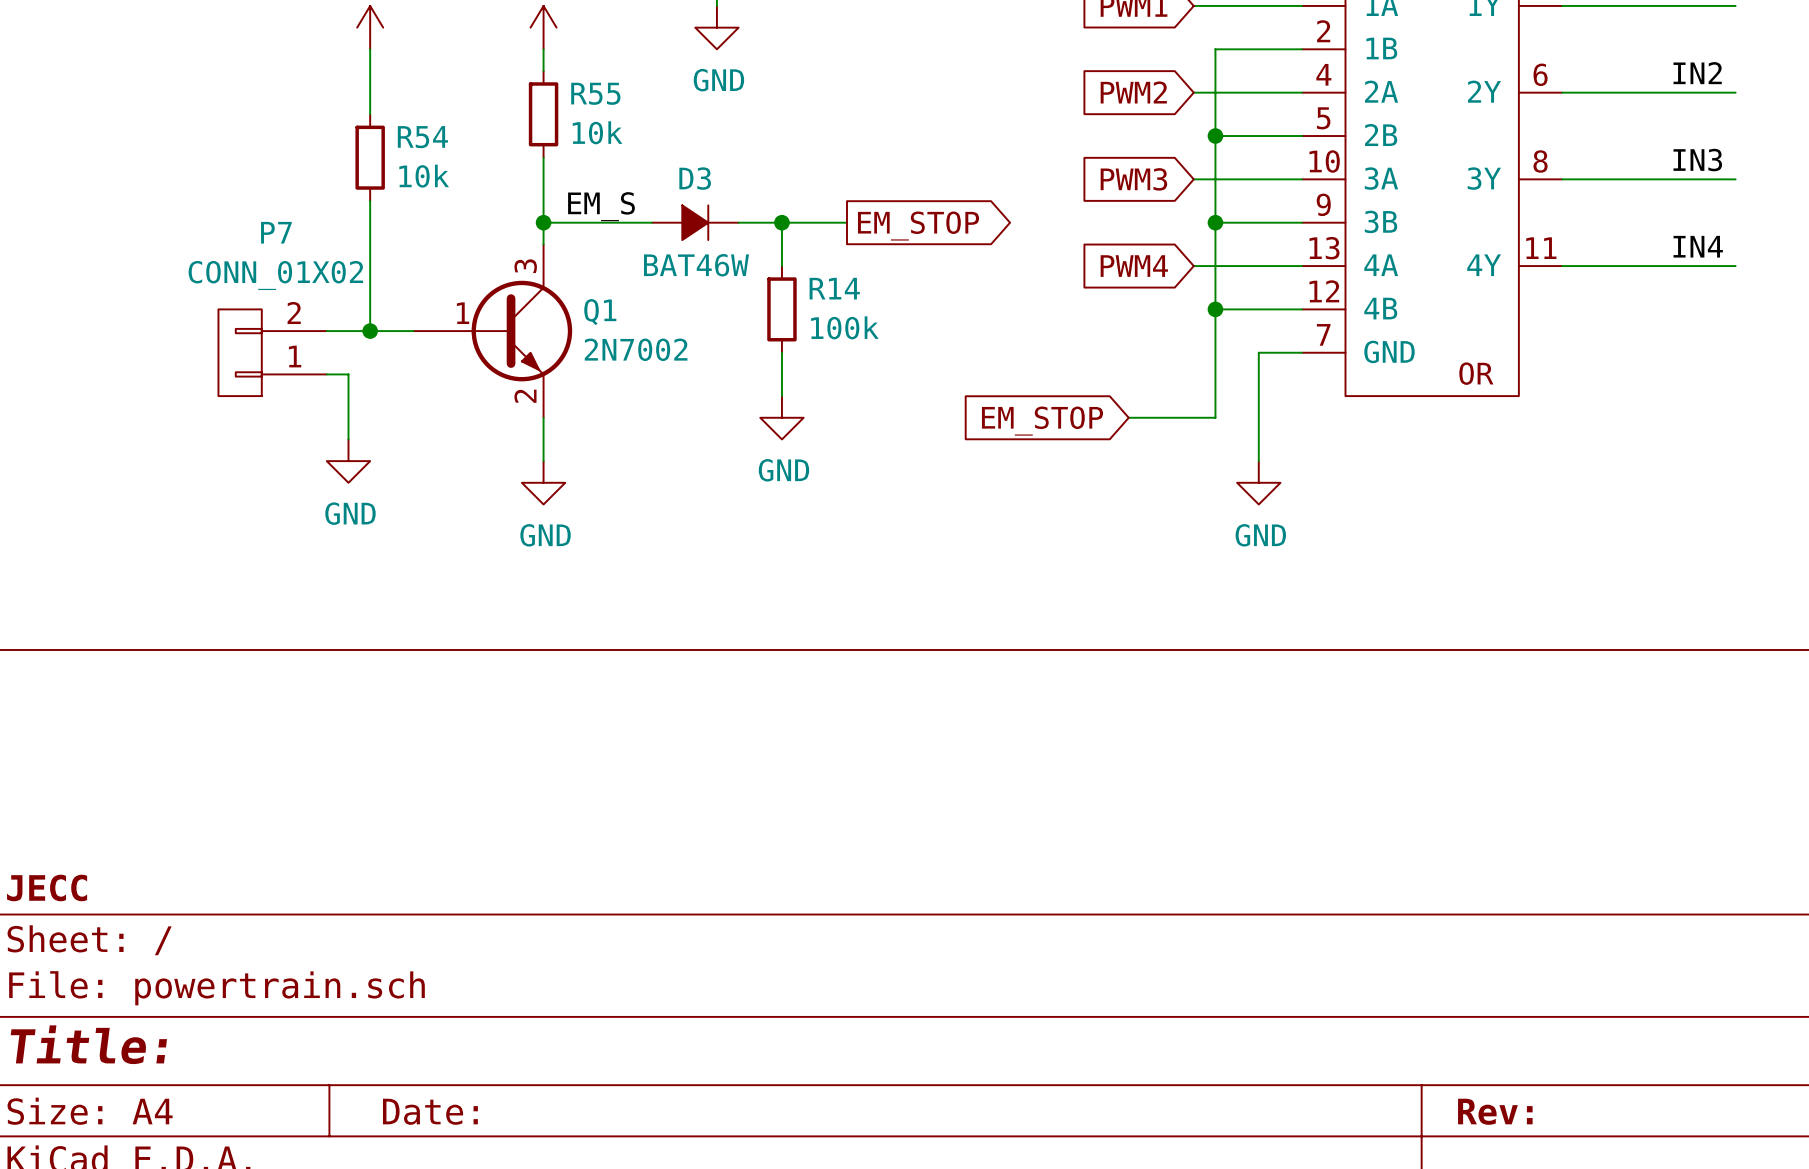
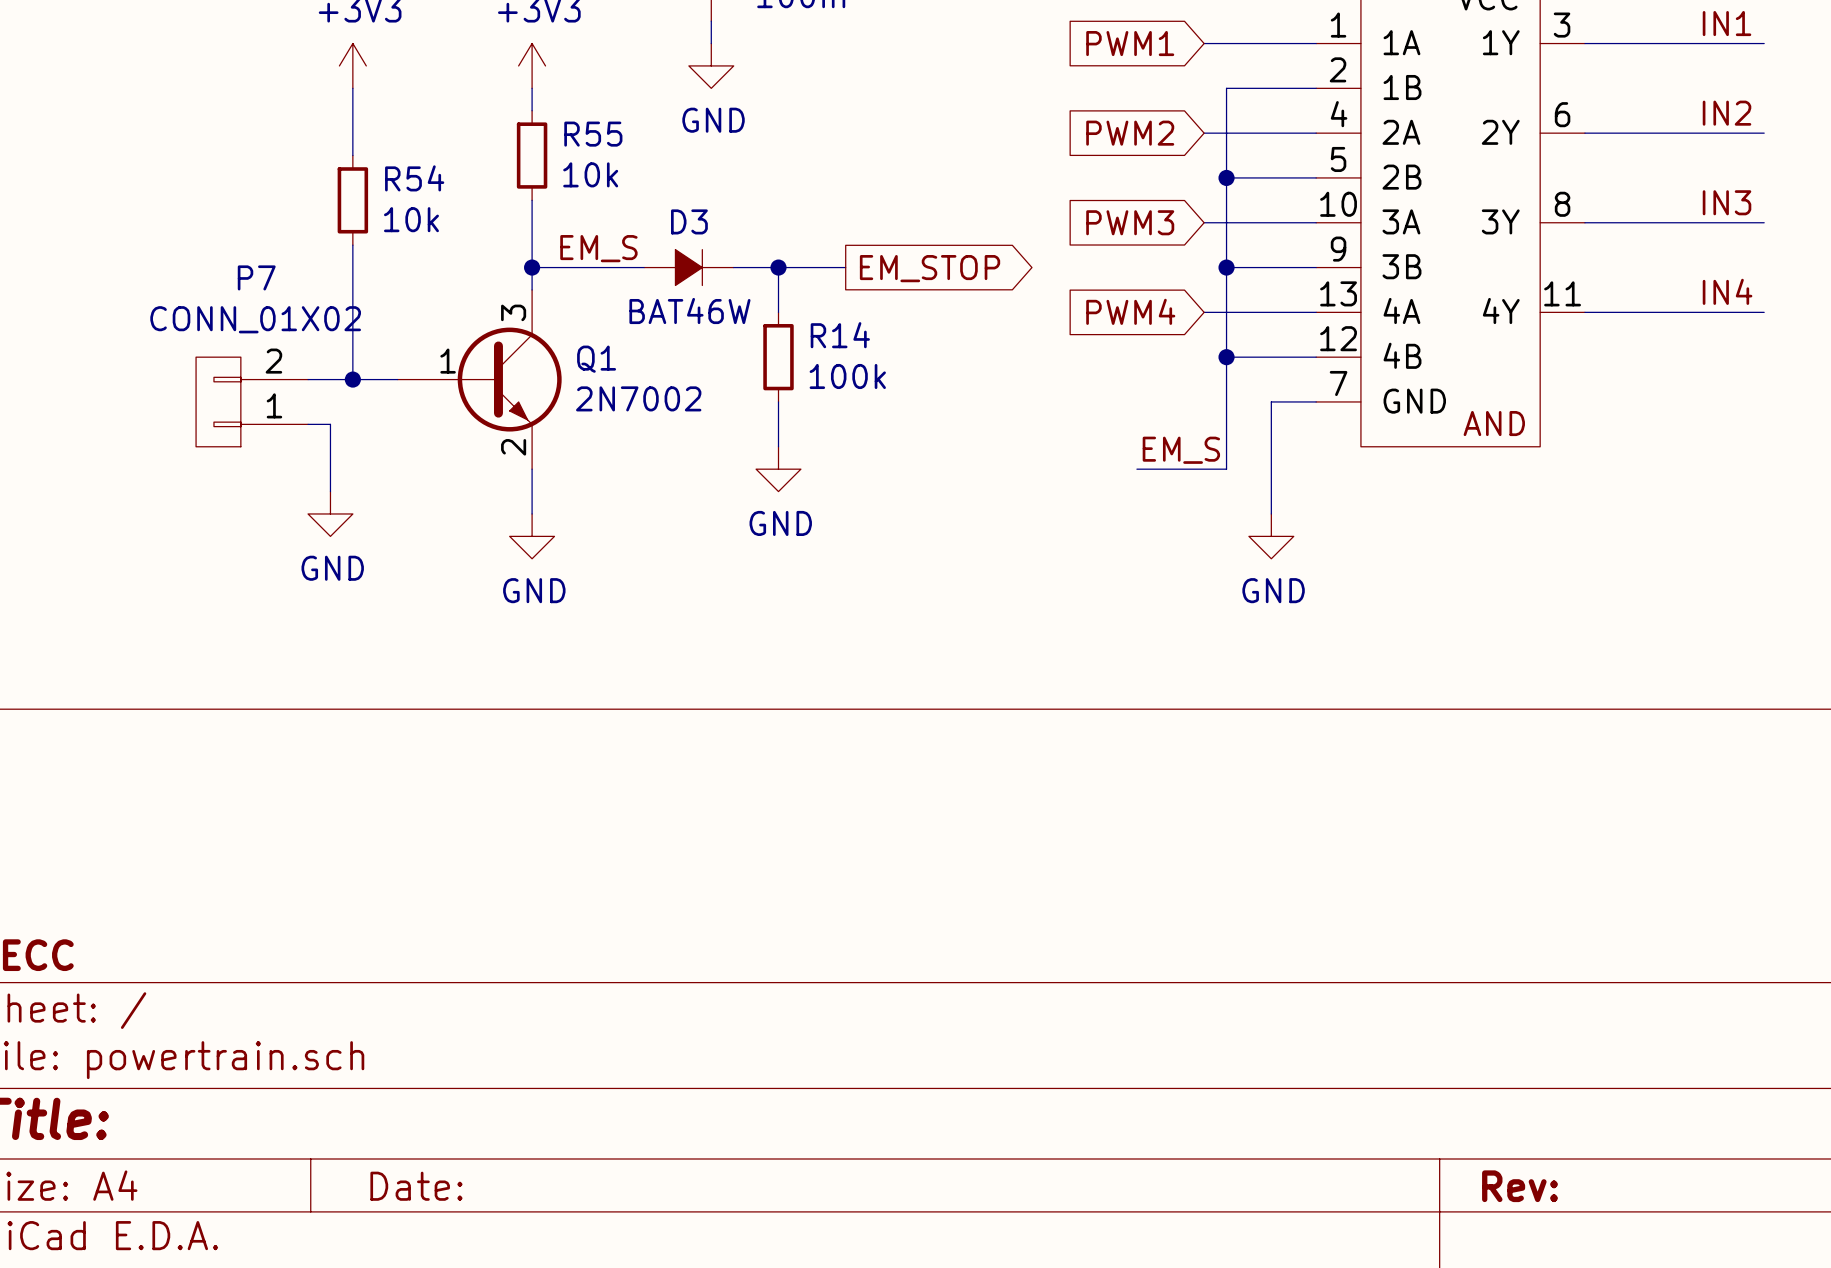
part text: OR (1476, 373) -> AND (1494, 423)
label: none -> EM_S (1181, 450)
global label: EM_STOP (1042, 421) -> none

